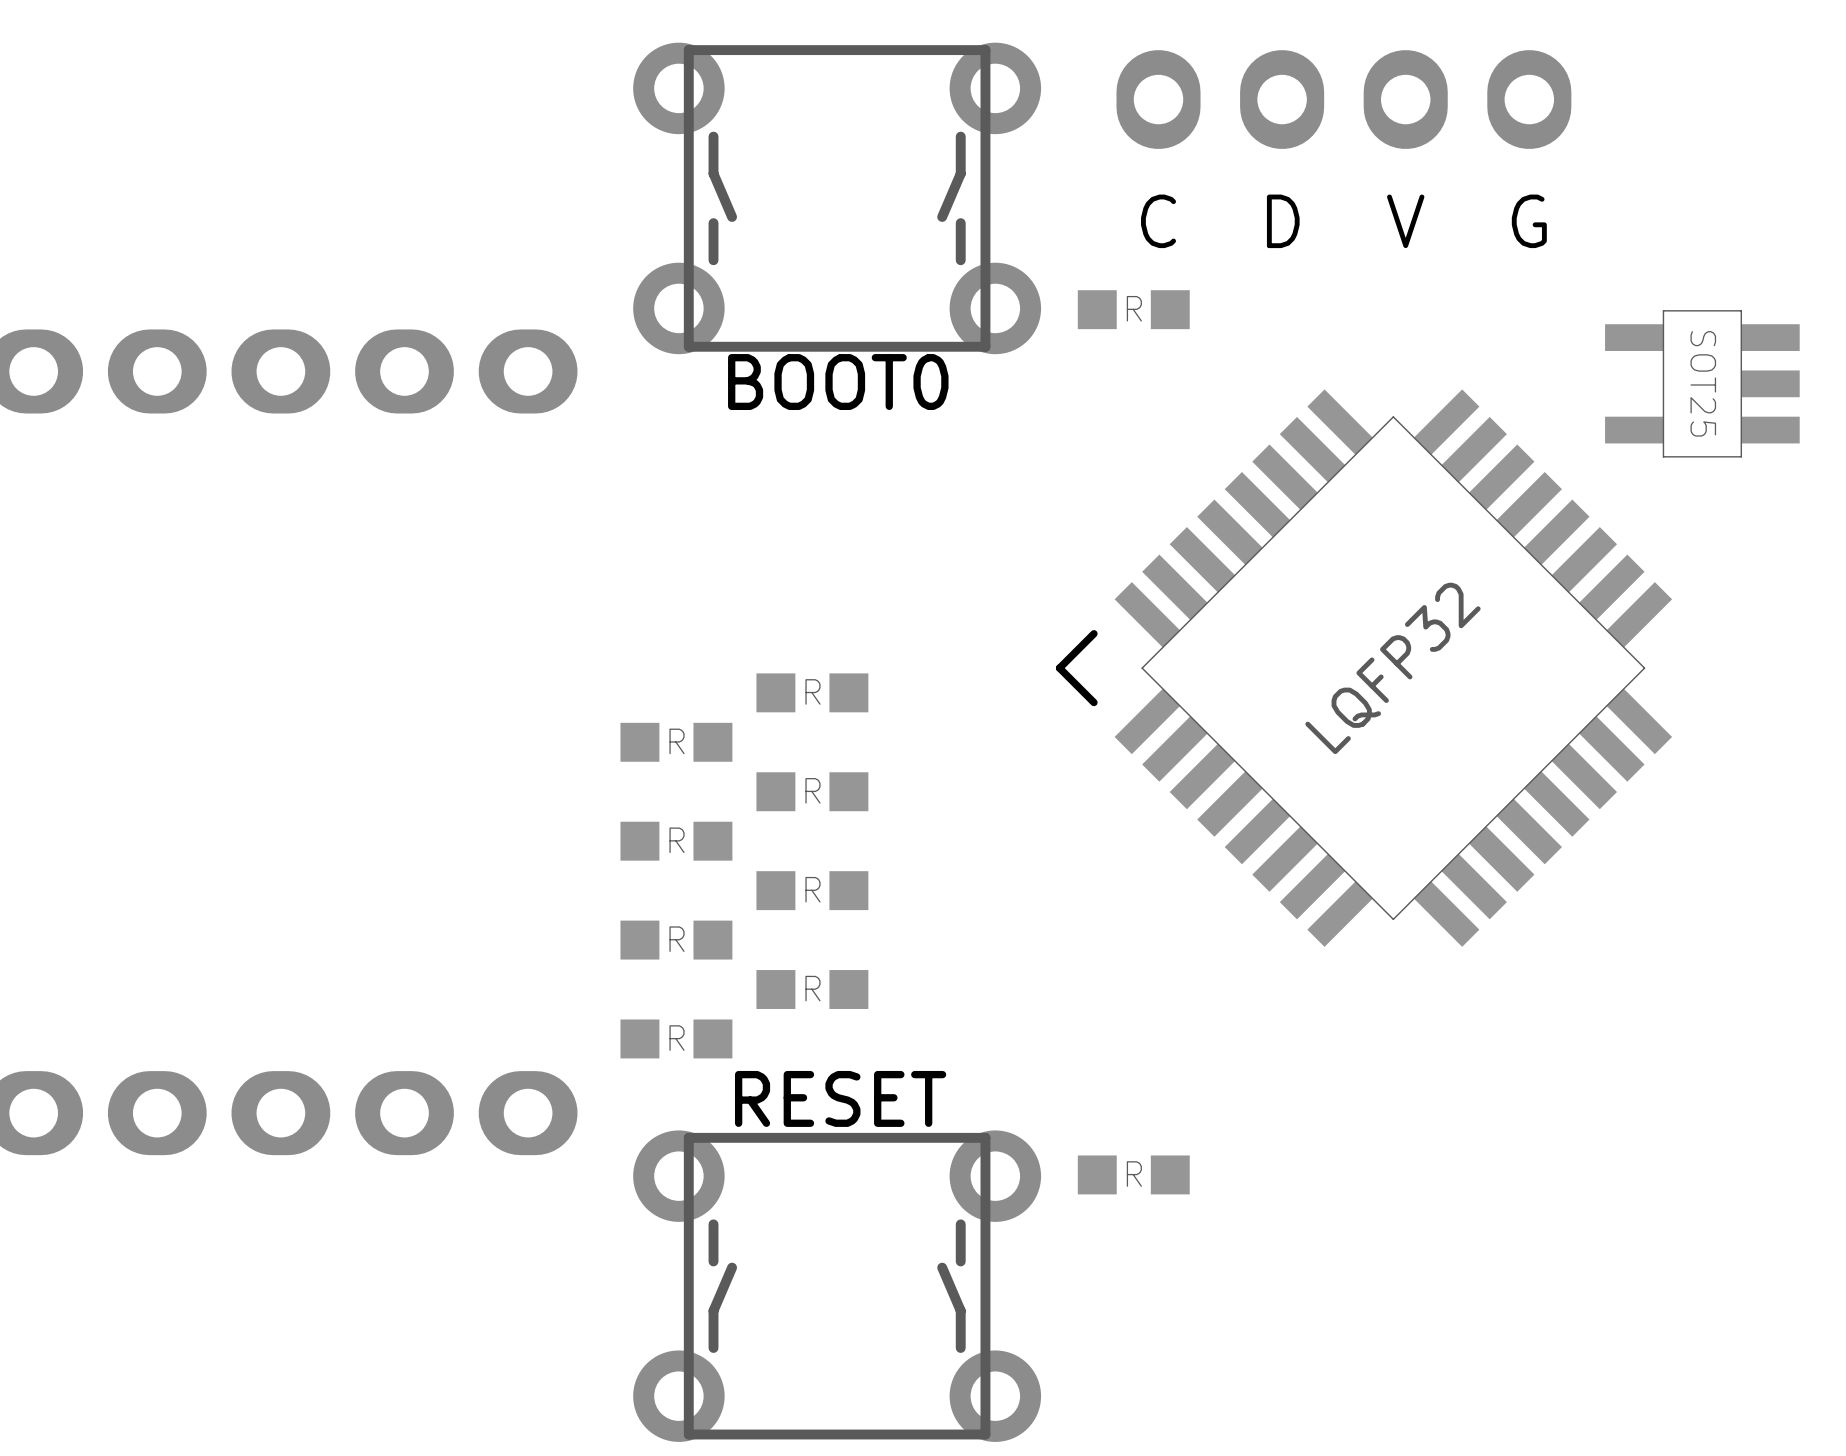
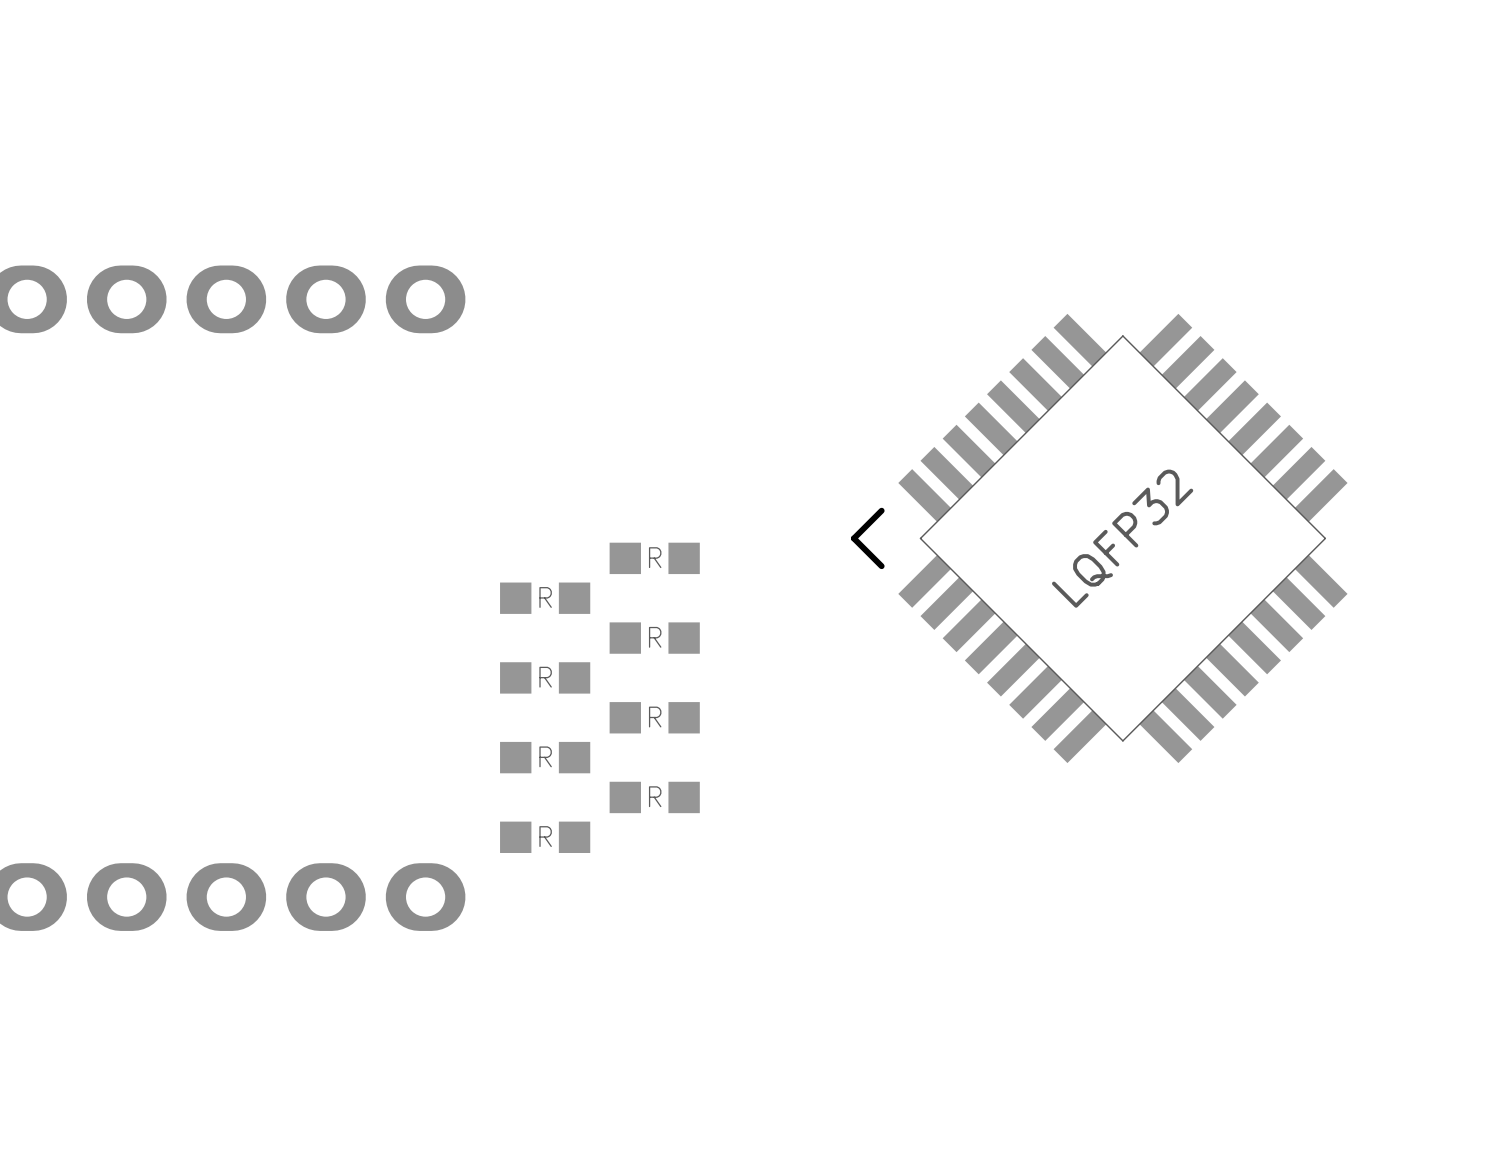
part: (1343, 99) -> none
BOOT0: (837, 198) -> none
text: C (1158, 221) -> none
text: D (1283, 221) -> none
text: V (1405, 221) -> none
text: G (1529, 221) -> none
part: R (1133, 309) -> none
part: (1702, 383) -> none
part: R (1133, 1174) -> none
RESET: (837, 1286) -> none

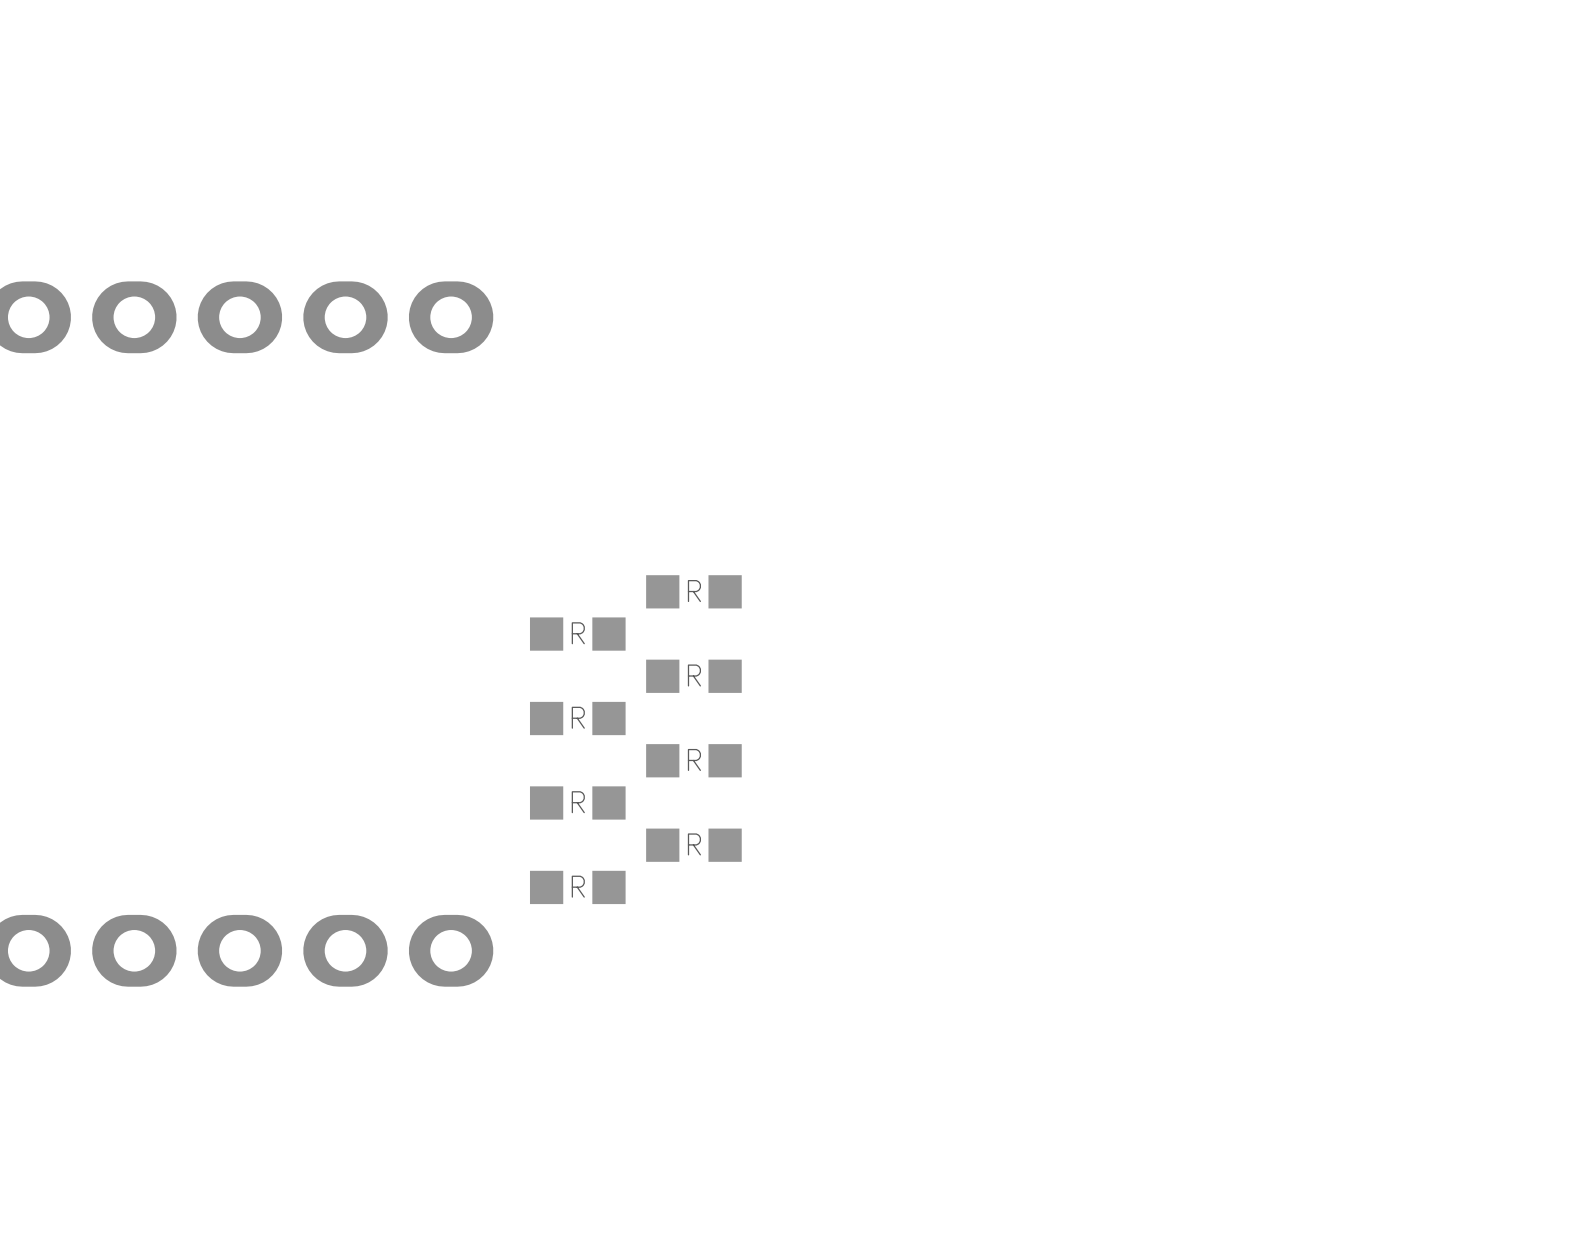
part: (1099, 538) -> none

